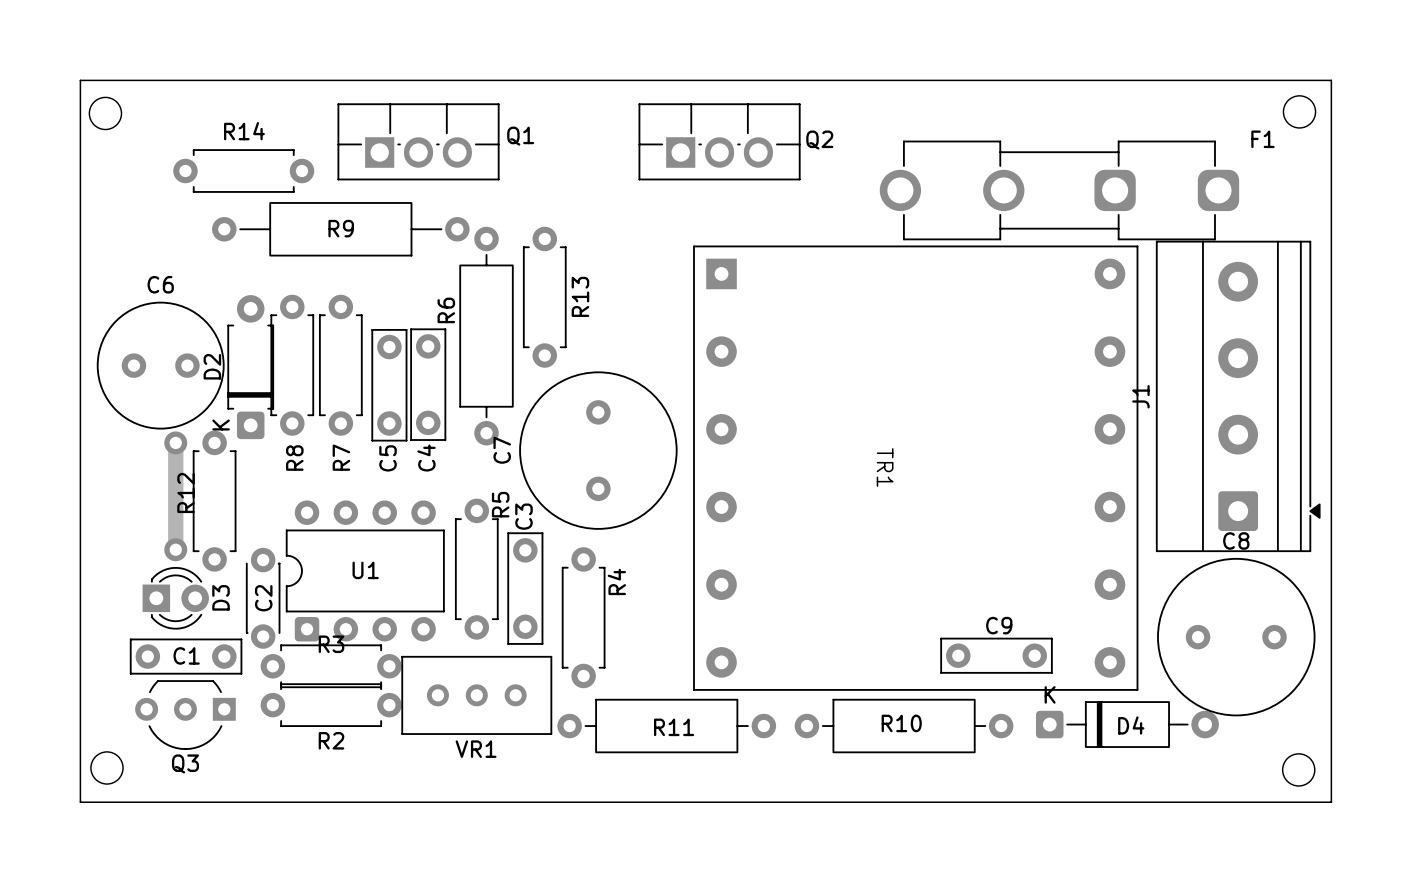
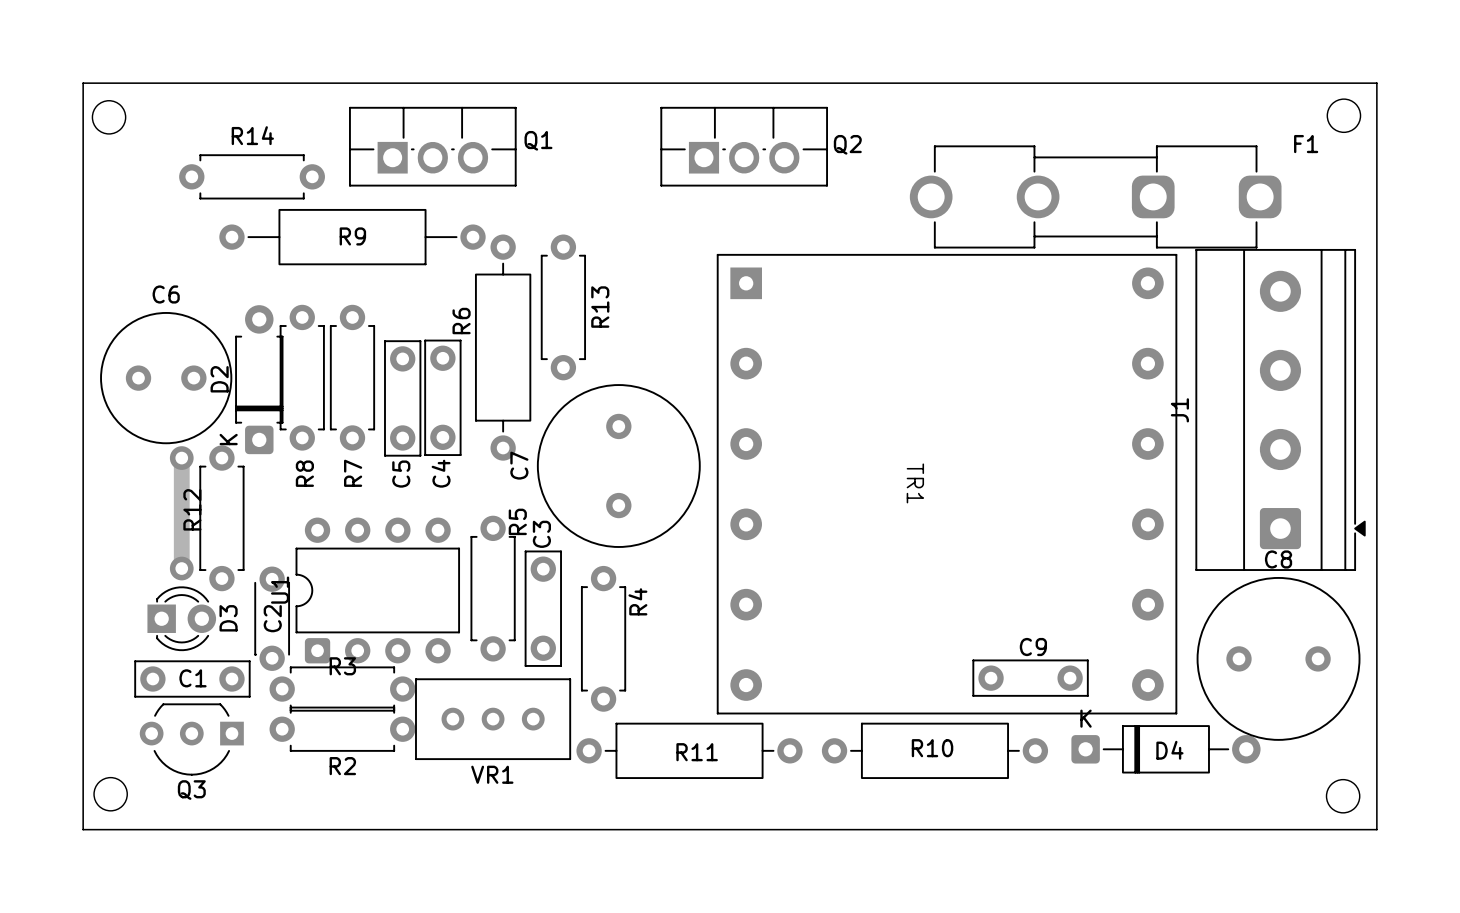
U1 name rotation: 0° (365, 570) -> 90° counterclockwise (280, 590)
U1 name position: U1 (365, 570) -> U1 (280, 590)

